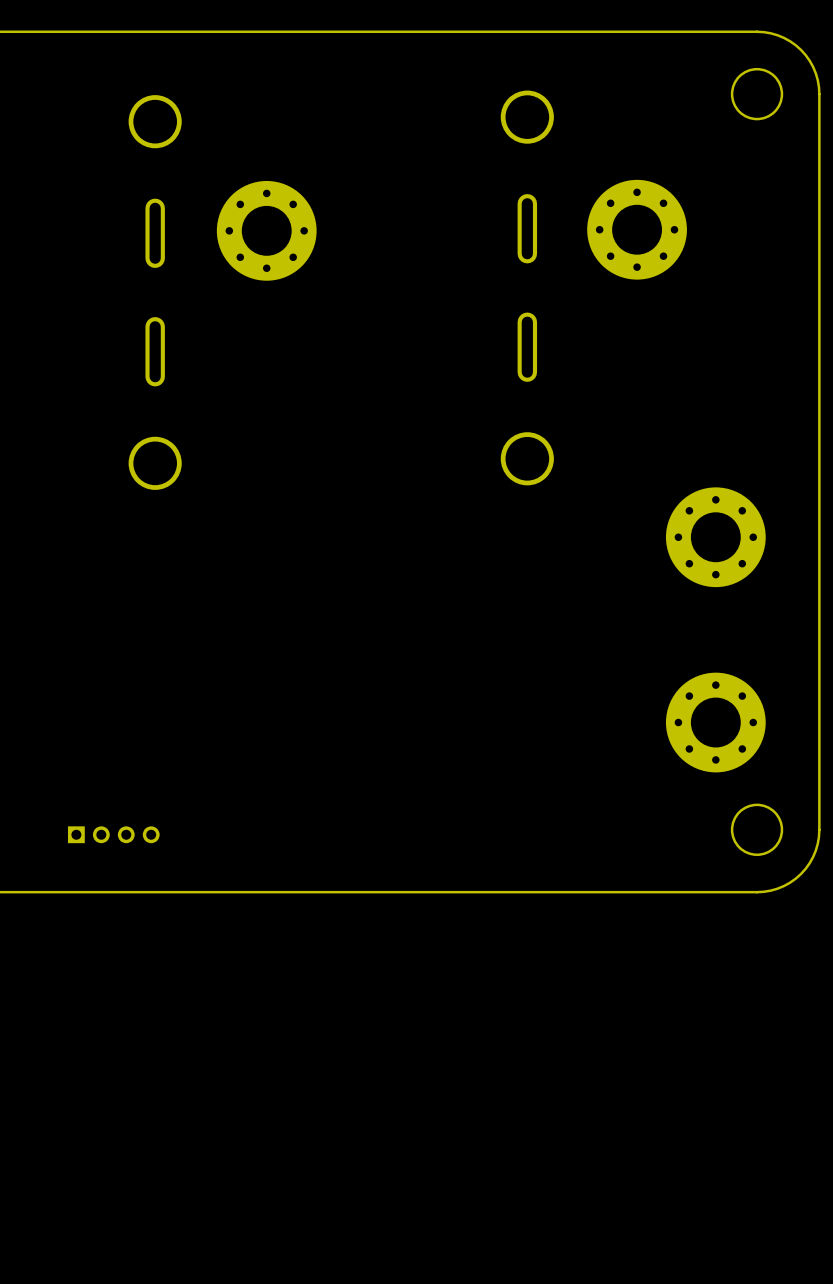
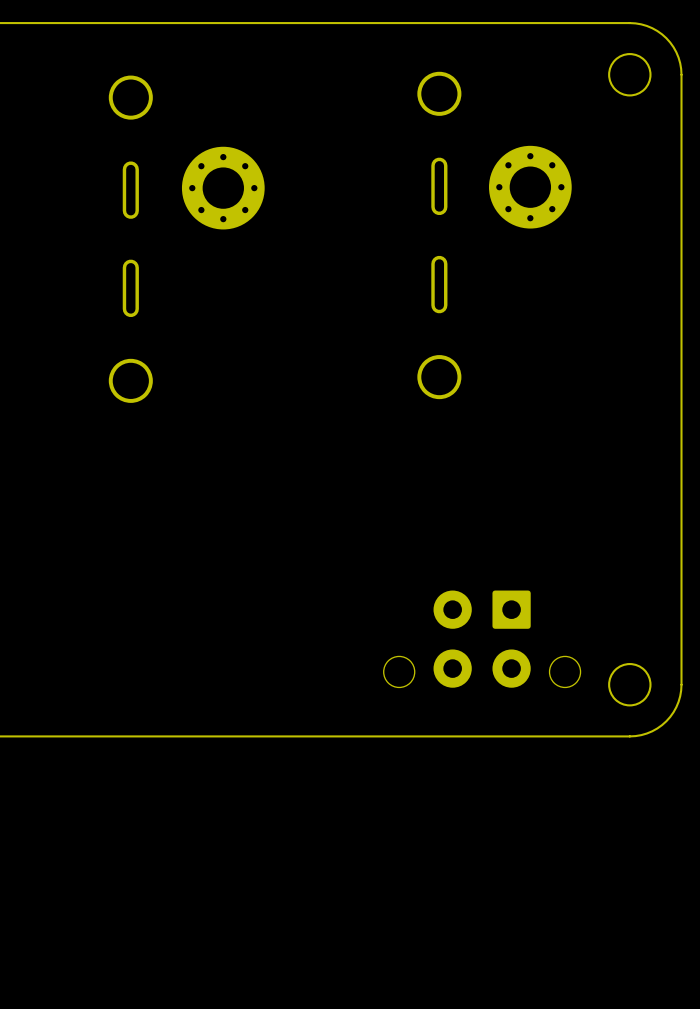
part: (715, 537) -> none
part: (715, 722) -> none
part: none -> (482, 639)
part: (113, 834) -> none

